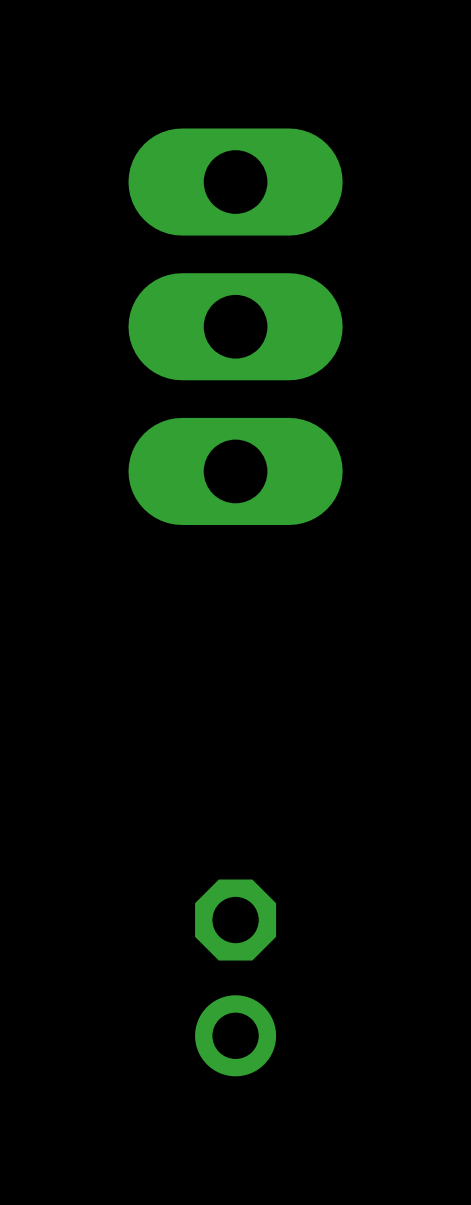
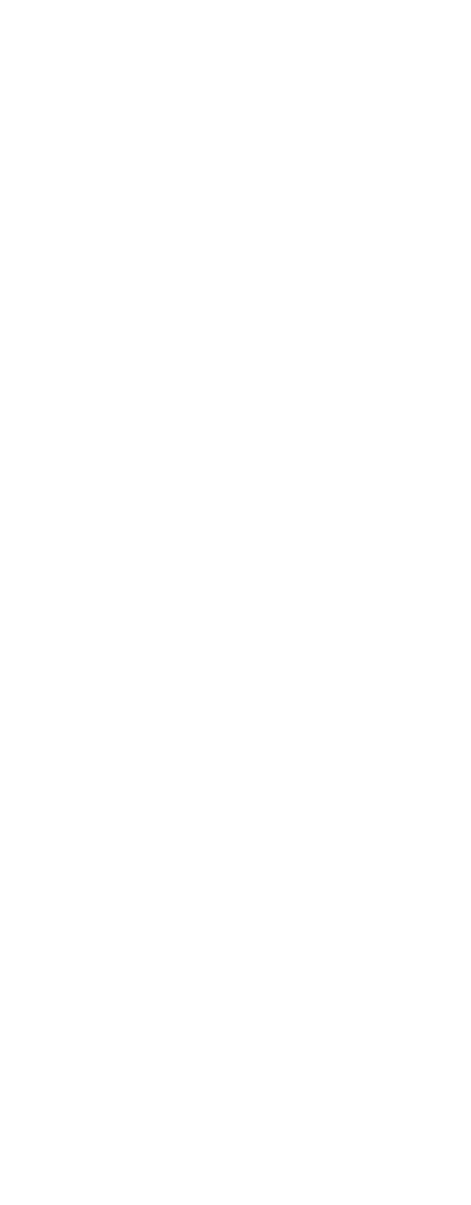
part: (235, 326) -> none
part: (235, 977) -> none

